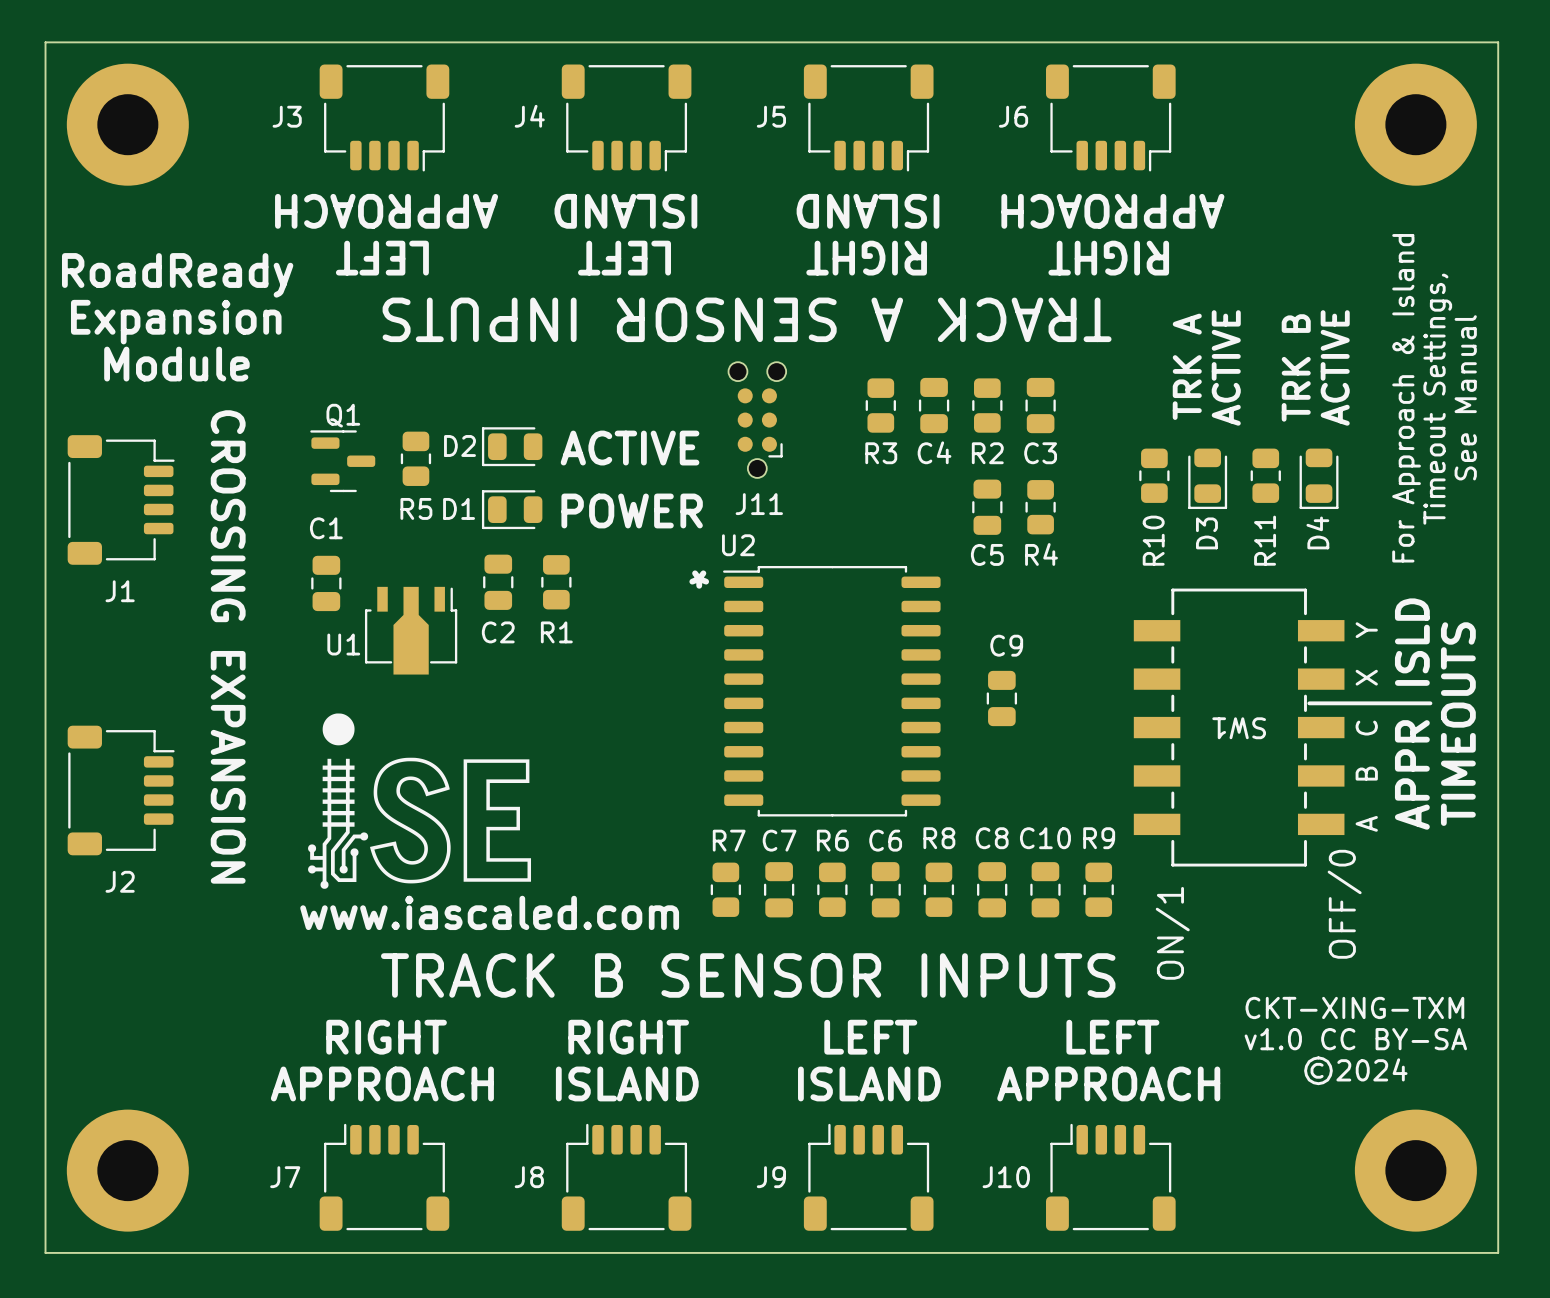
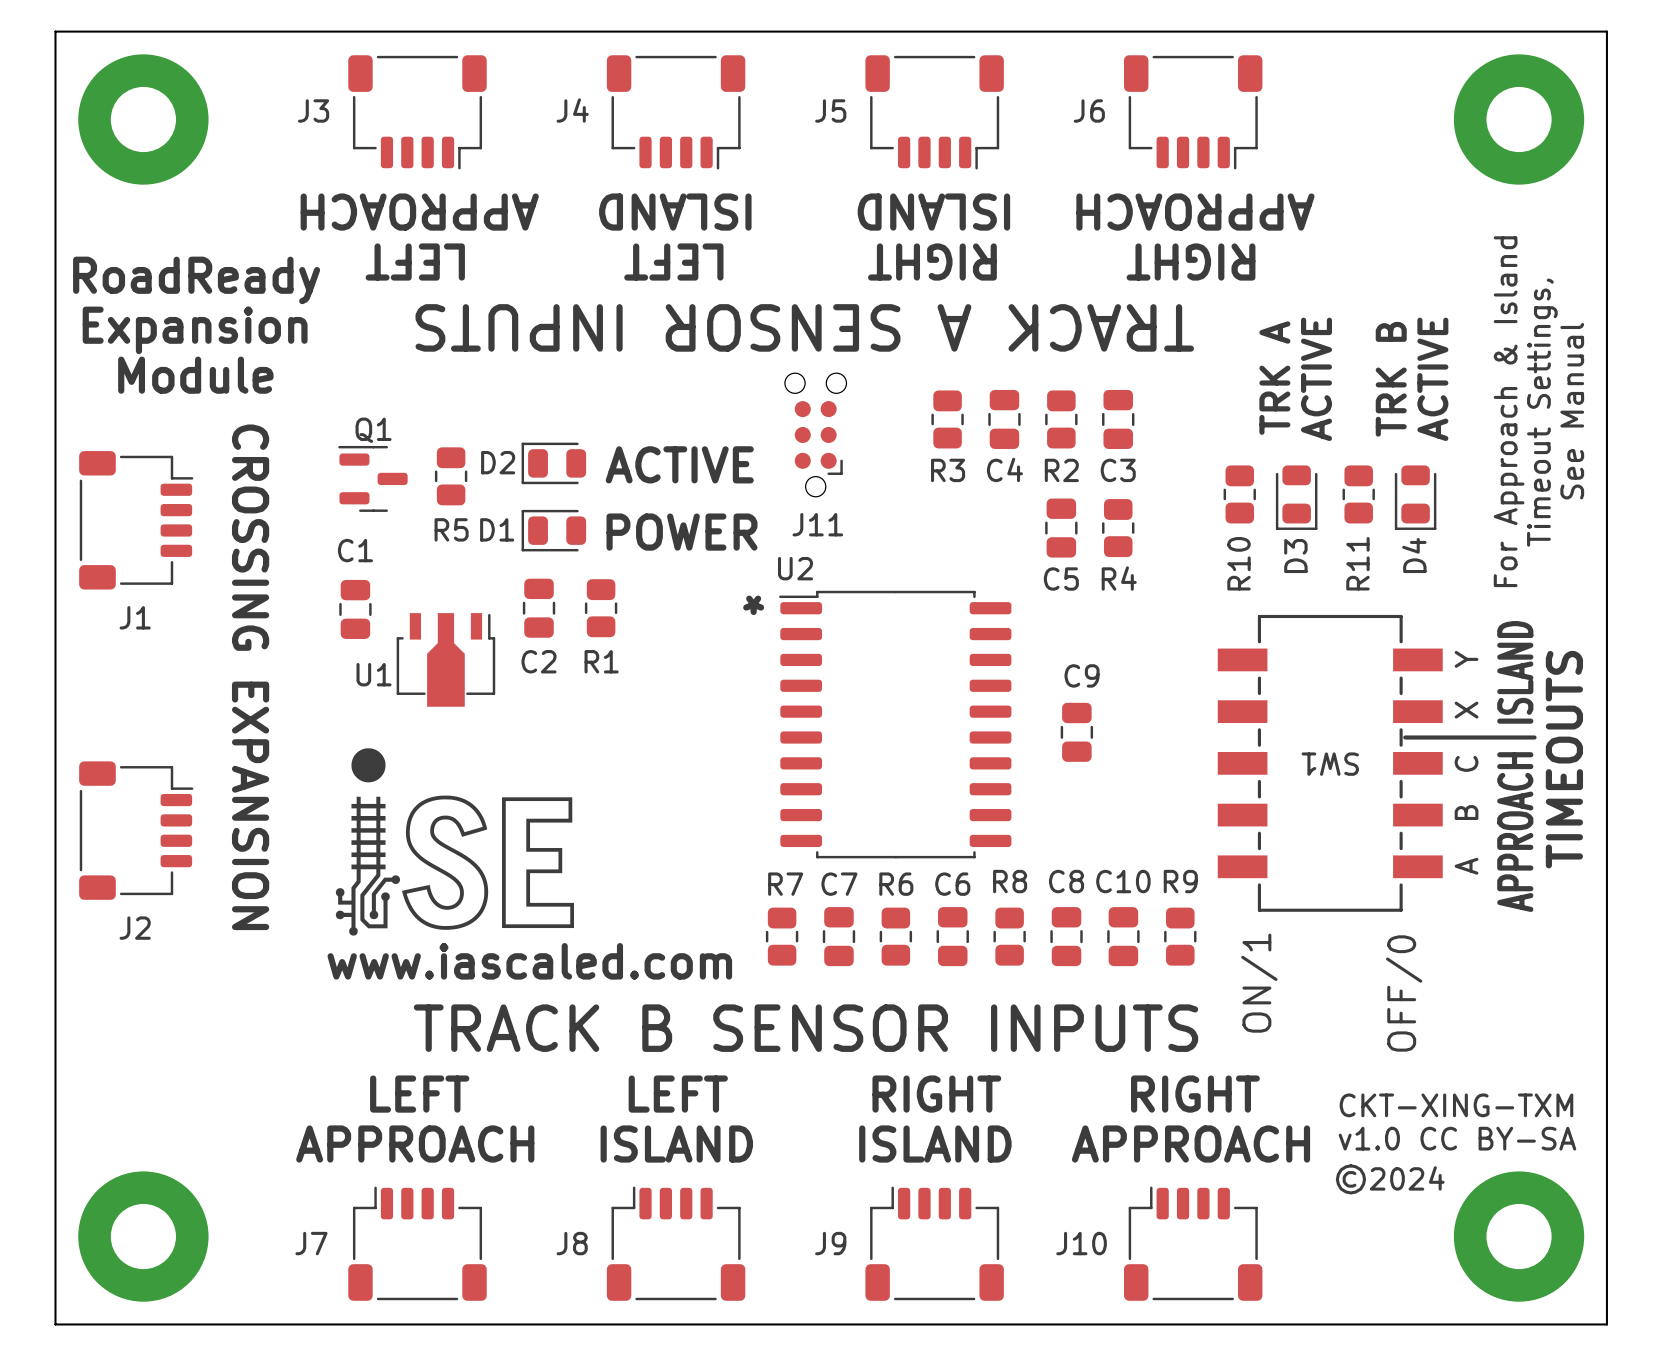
text: ISLD (1412, 642) -> ISLAND (1515, 672)
text: APPR (1412, 774) -> APPROACH (1515, 832)
SW1 text position: OFF/0 (1344, 904) -> OFF/0 (1404, 993)
text: CKT-XING-TXM (1354, 1007) -> none
text: RIGHT (386, 1037) -> LEFT (419, 1094)
text: RIGHT (628, 1037) -> LEFT (678, 1094)
text: LEFT (870, 1037) -> RIGHT (936, 1094)
text: LEFT (1112, 1037) -> RIGHT (1195, 1094)
text: v1.0 CC BY-SA (1355, 1039) -> CKT-XING-TXM (1456, 1105)
text: ©2024 (1355, 1070) -> v1.0 CC BY-SA (1457, 1138)
text: none -> ©2024 (1390, 1179)

